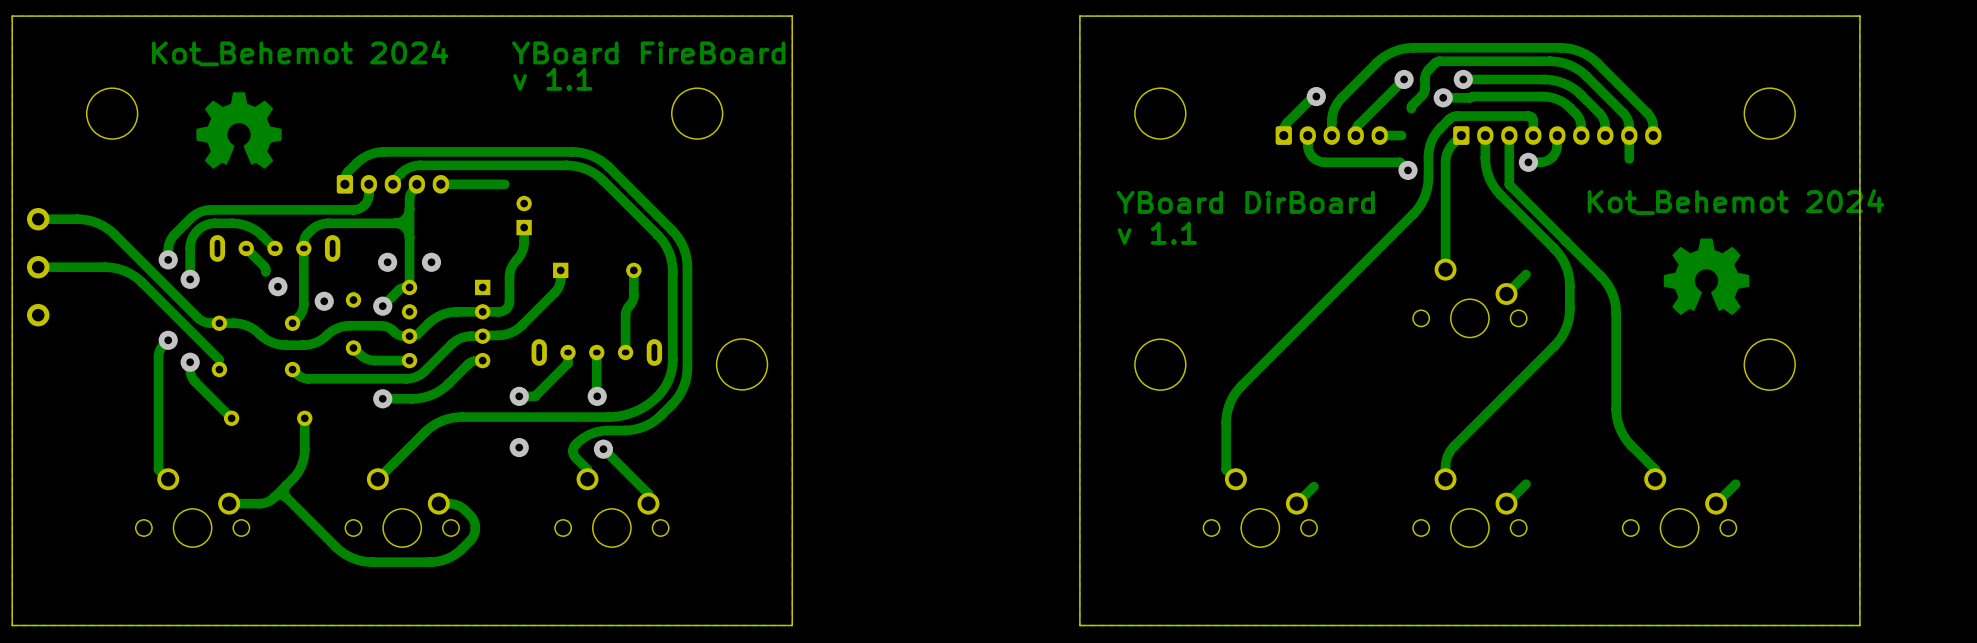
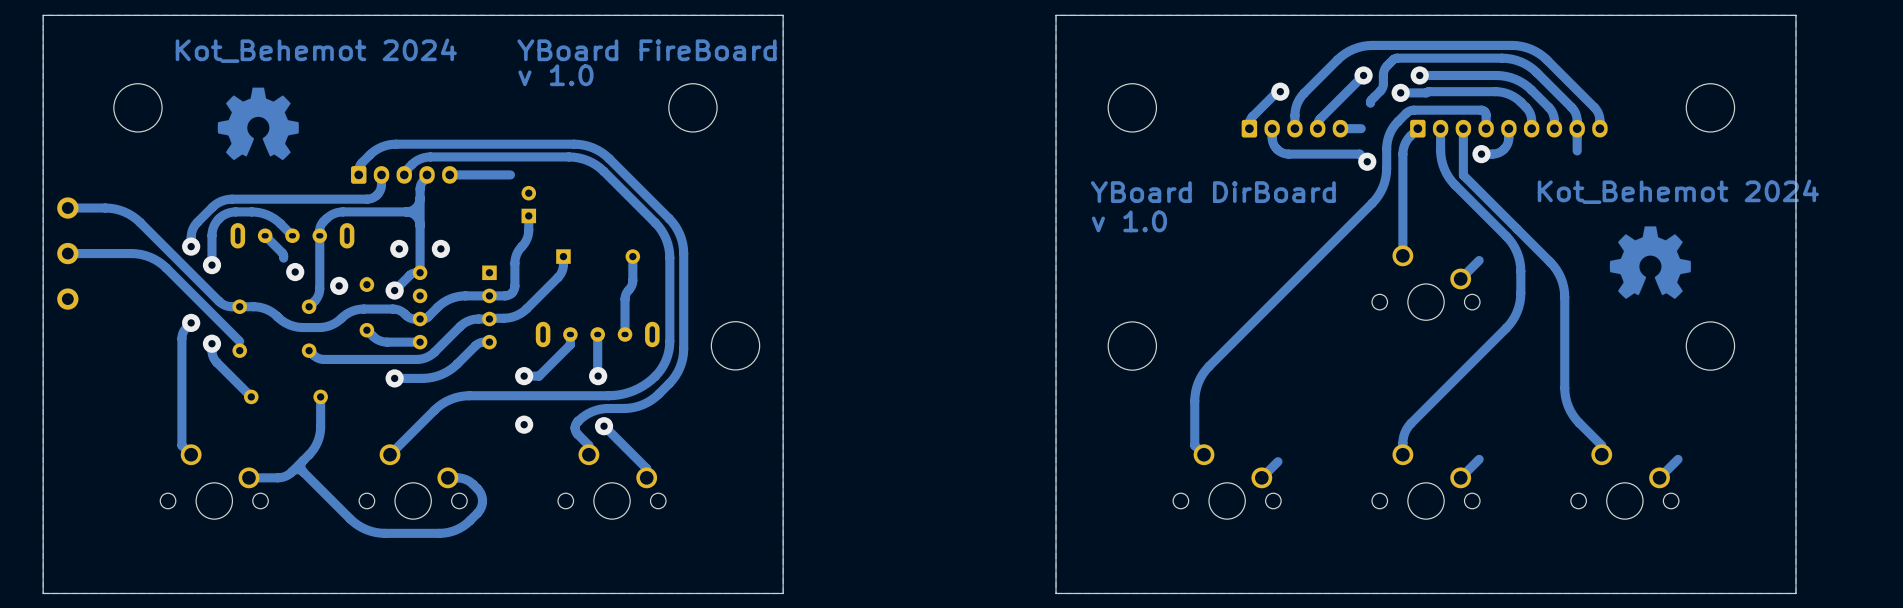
text: v 1.1 (552, 79) -> v 1.0 (555, 75)
text: v 1.1 (1157, 233) -> v 1.0 (1129, 221)

